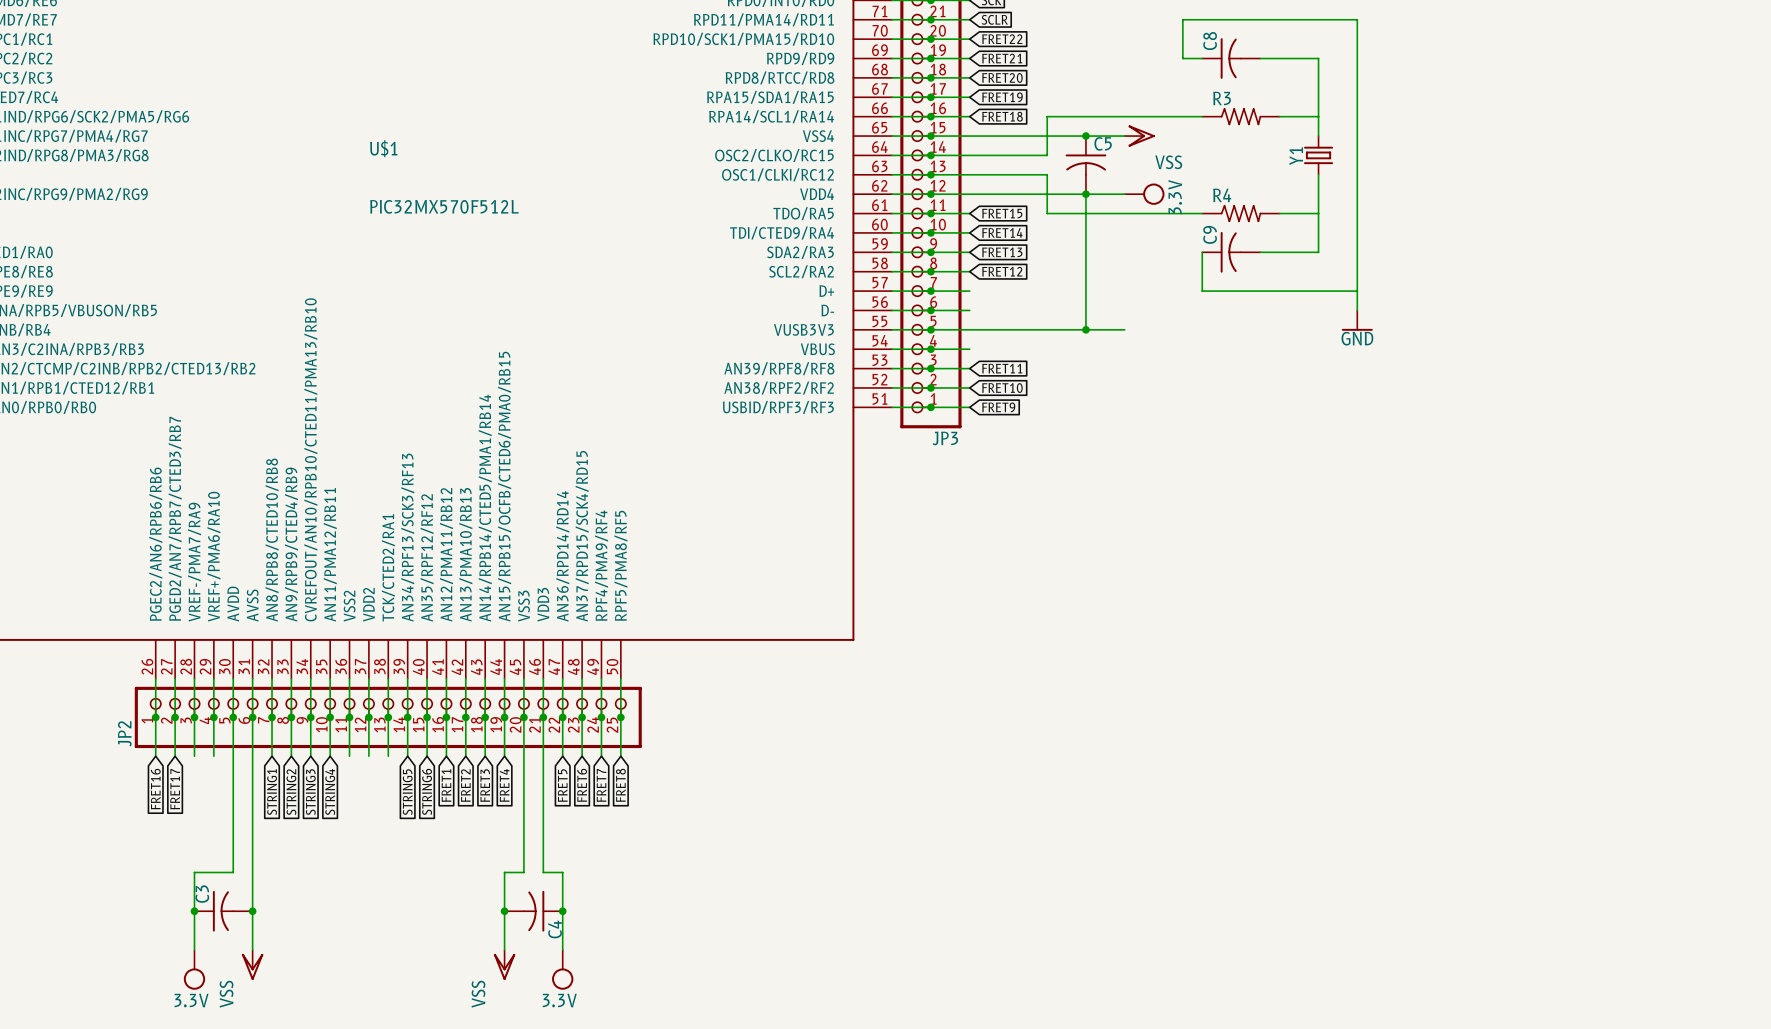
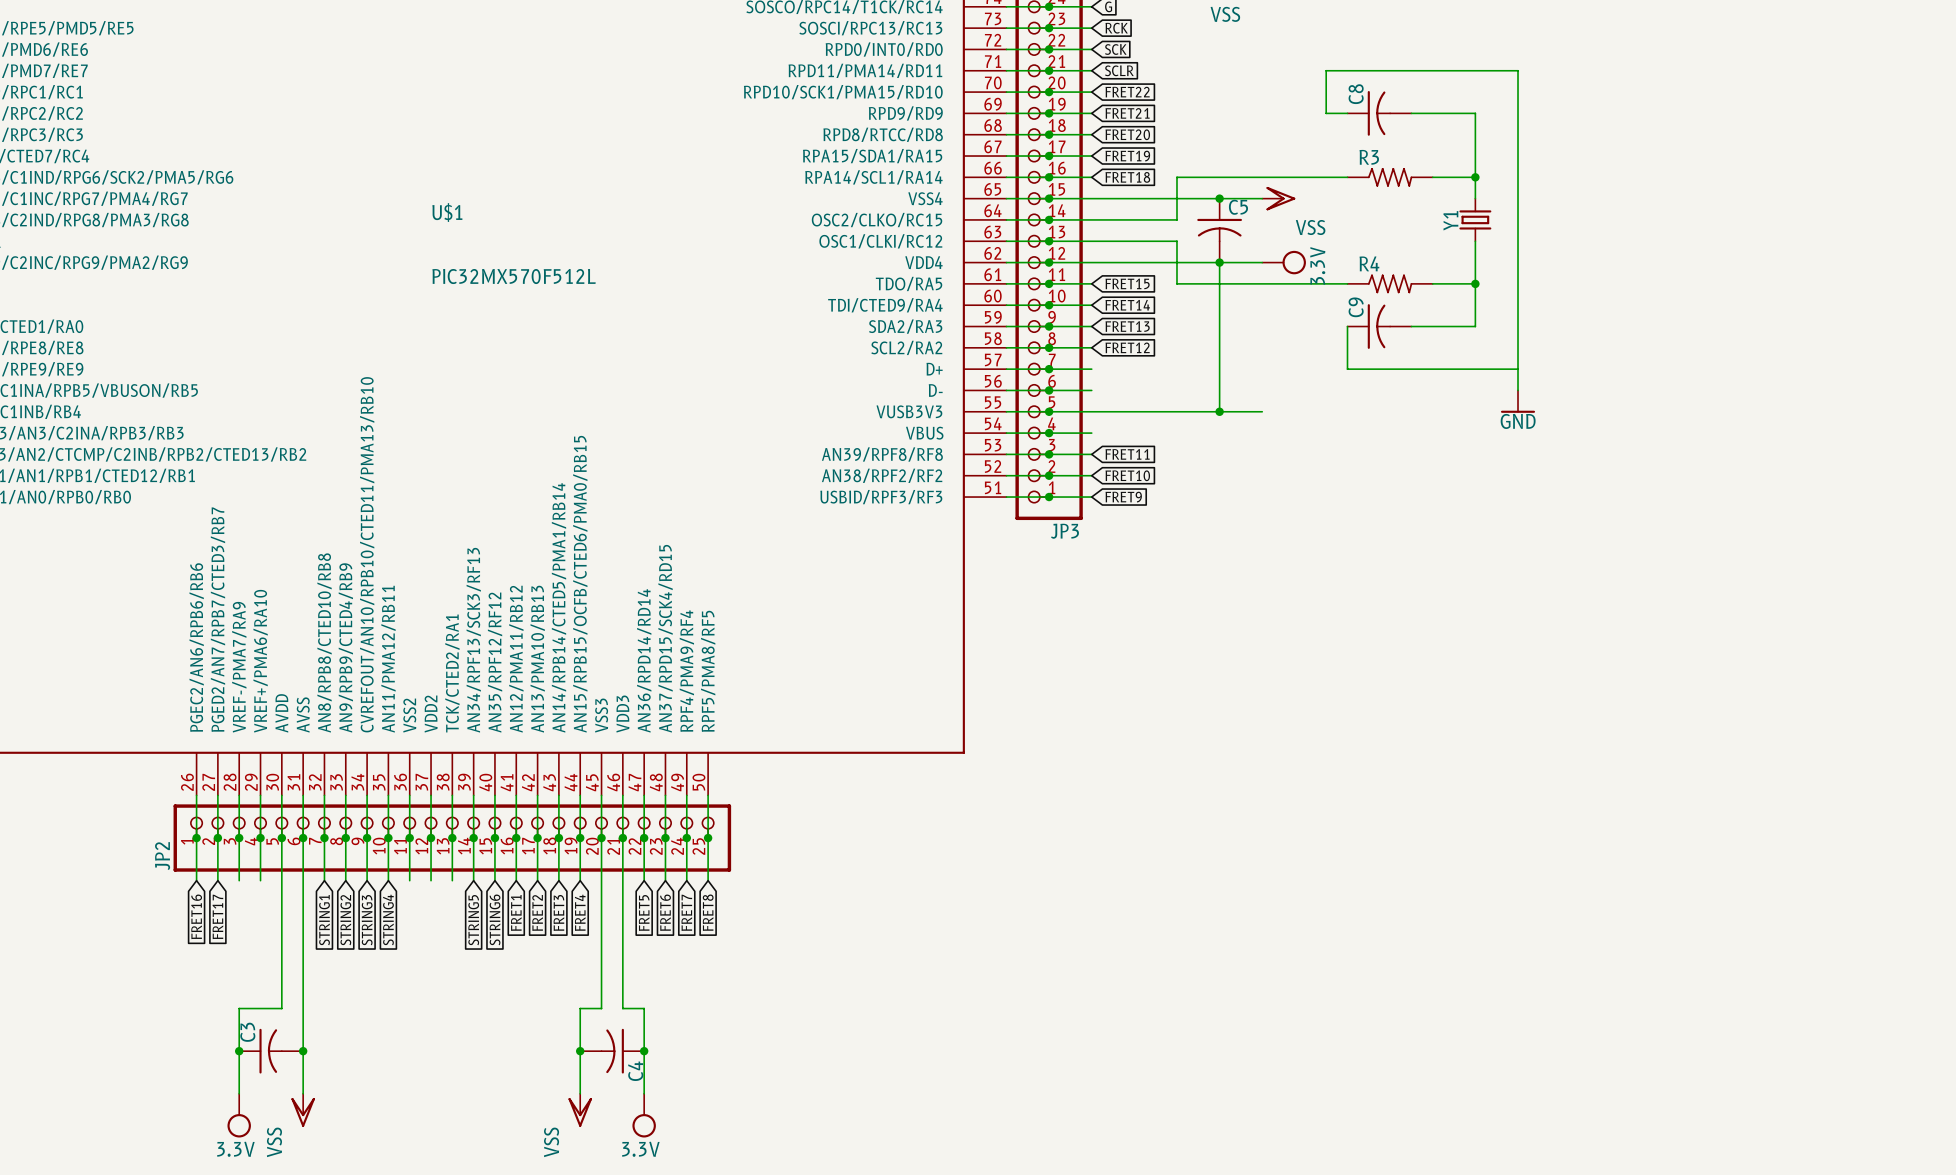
junction: none -> (1475, 177)
junction: none -> (1475, 283)

